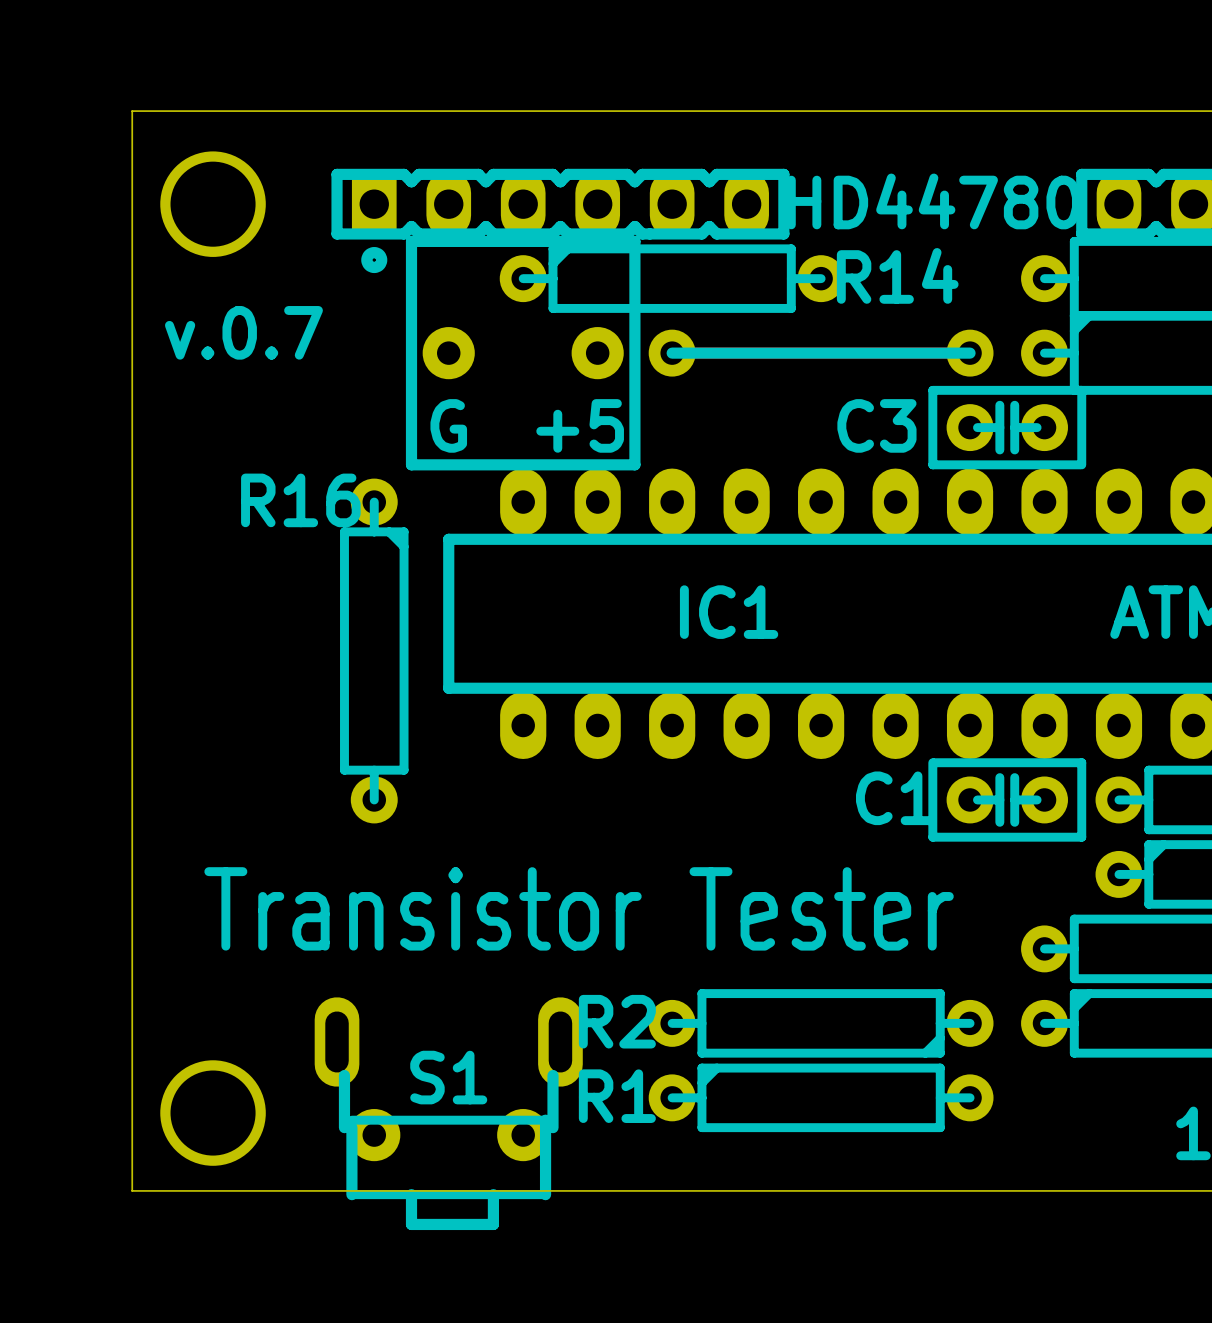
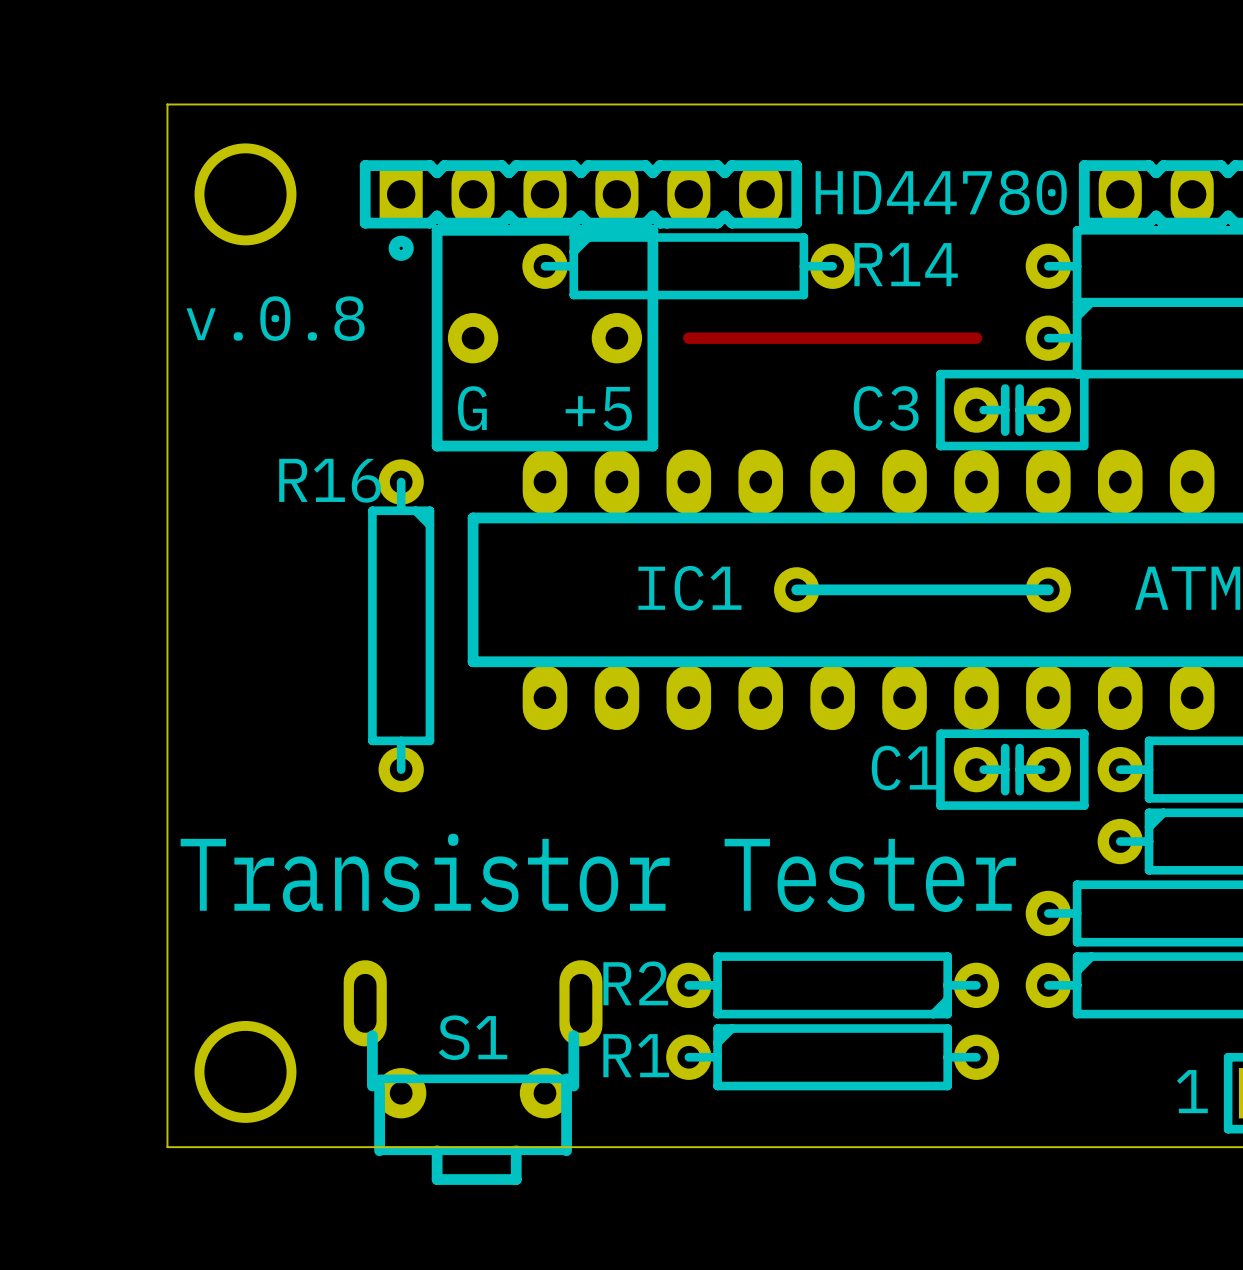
text: v.0.7 (243, 332) -> v.0.8 (275, 318)
line: (672, 353) (970, 353) -> none
part: (672, 353) -> none
part: (970, 353) -> none
IC1 name position: IC1 (729, 612) -> IC1 (689, 588)
line: none -> (796, 589) (1048, 589)
part: none -> (796, 589)
part: none -> (1048, 589)

